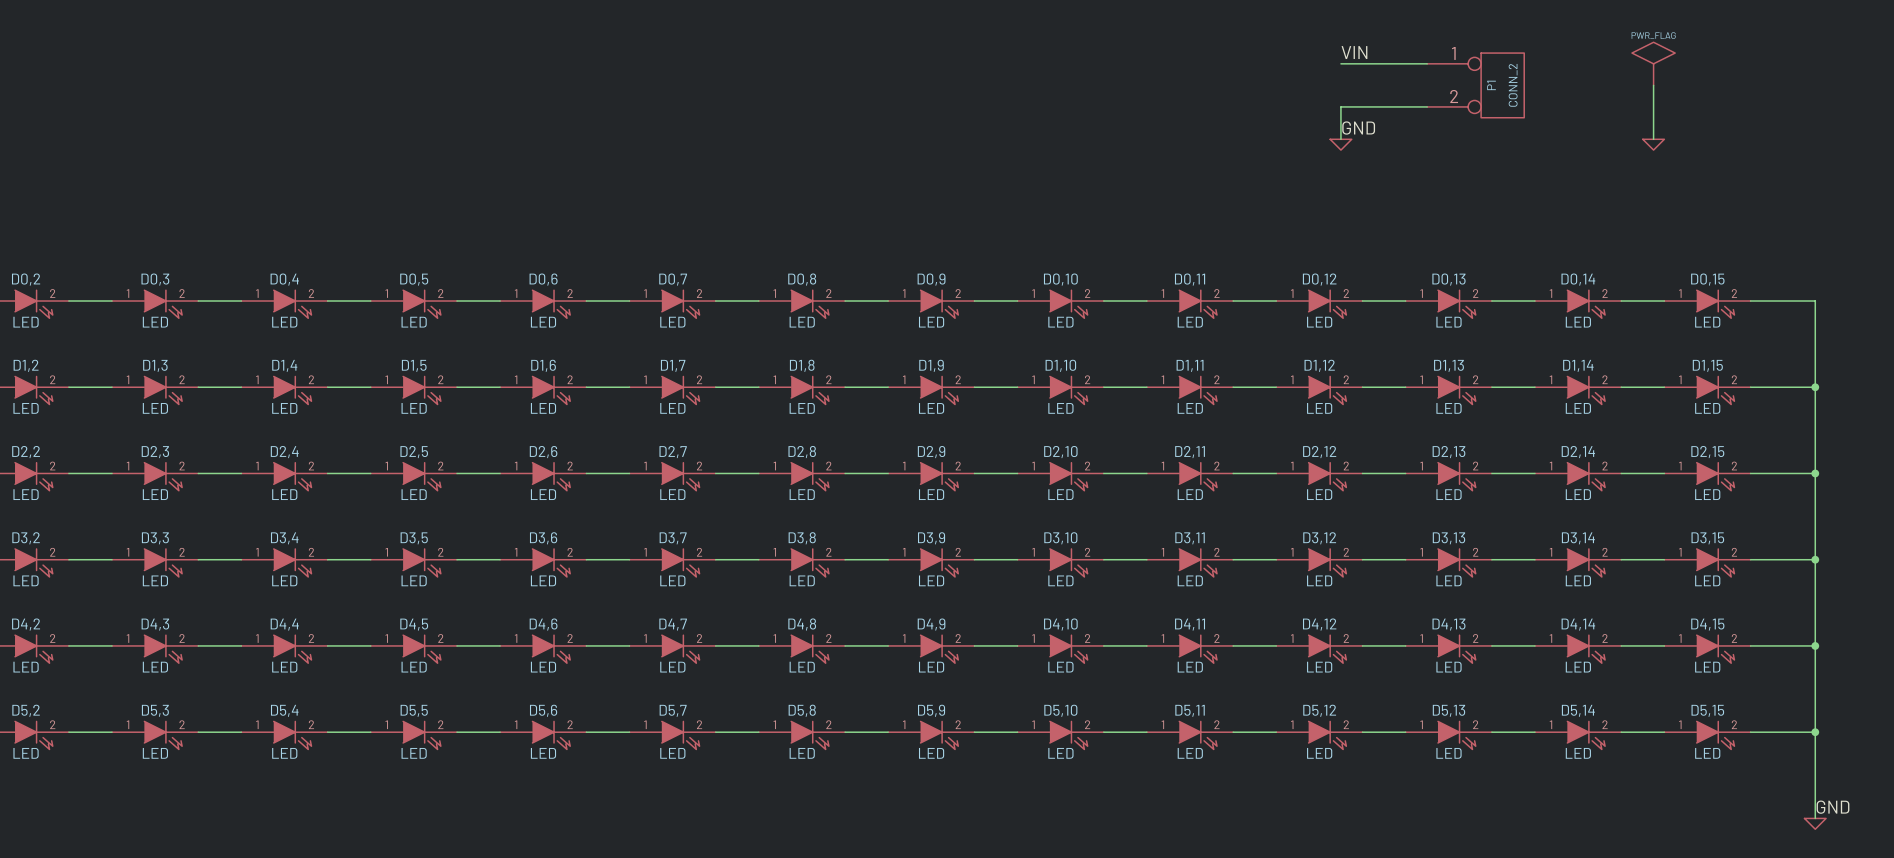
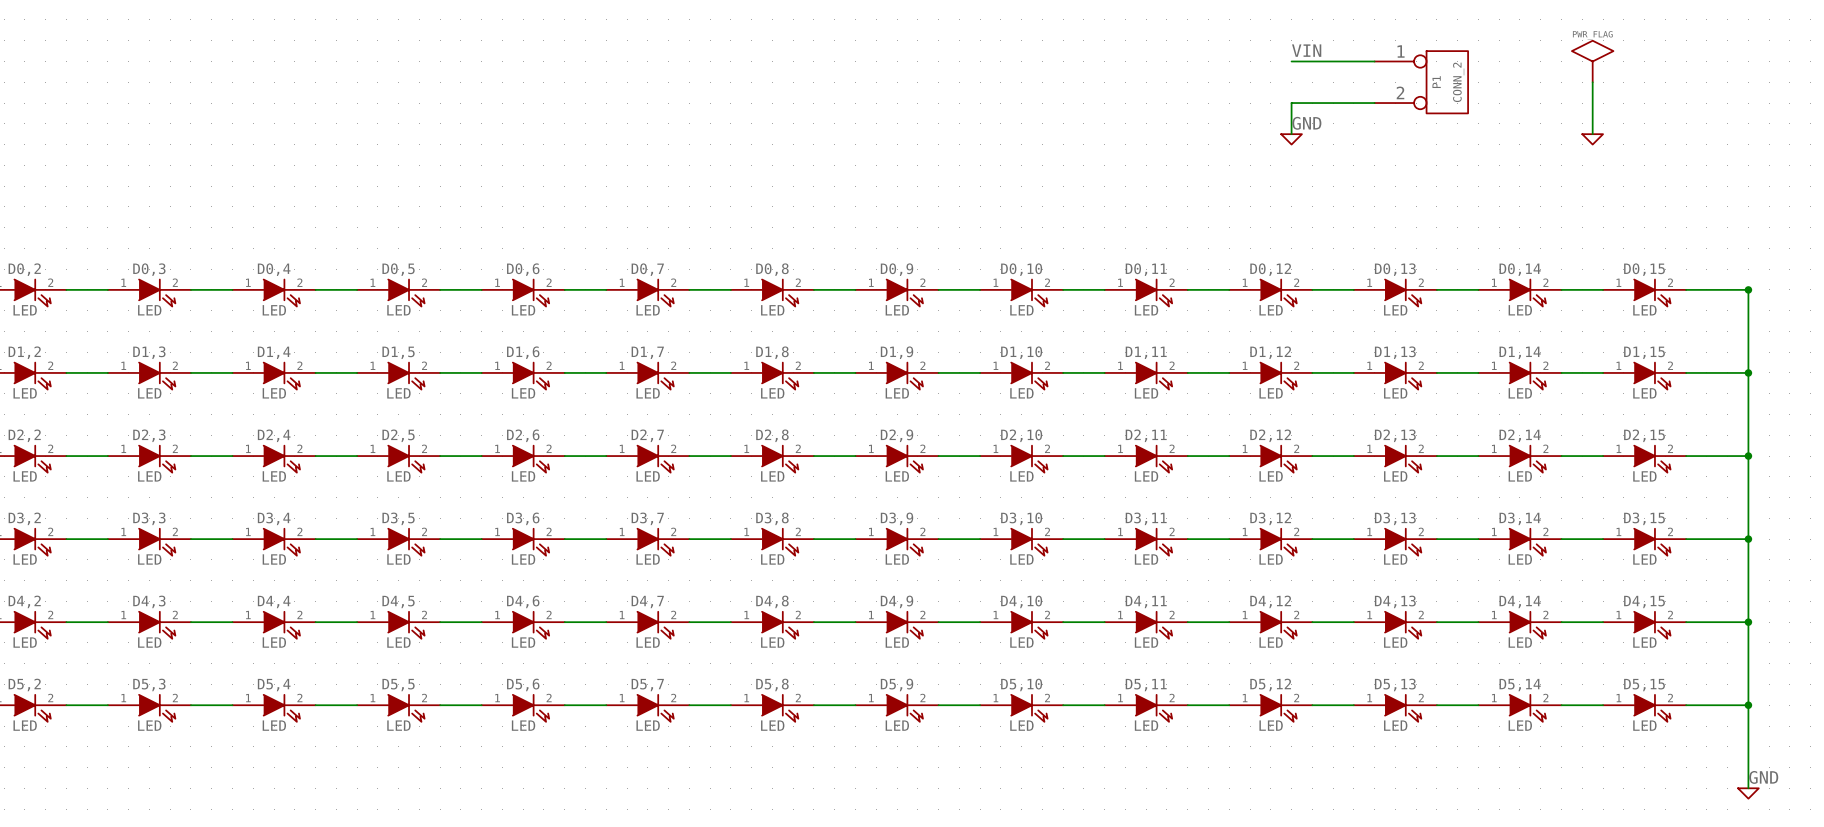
junction: none -> (1748, 289)

